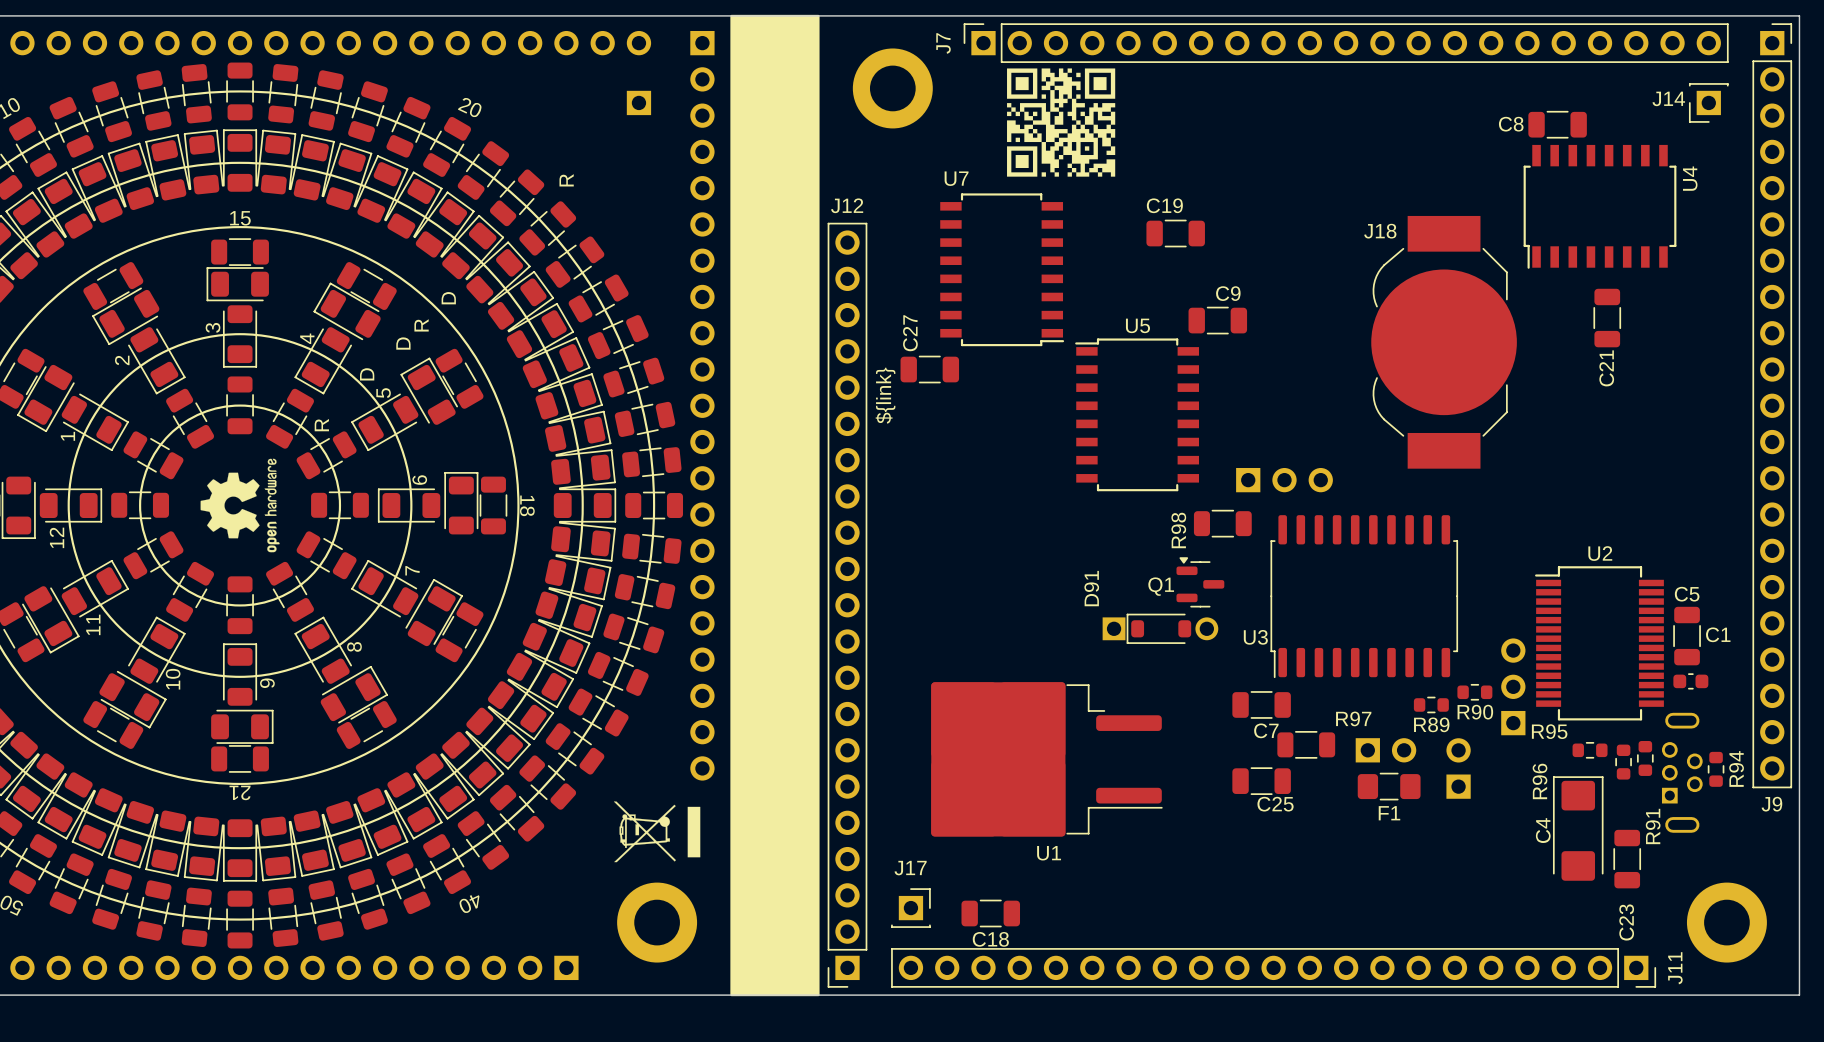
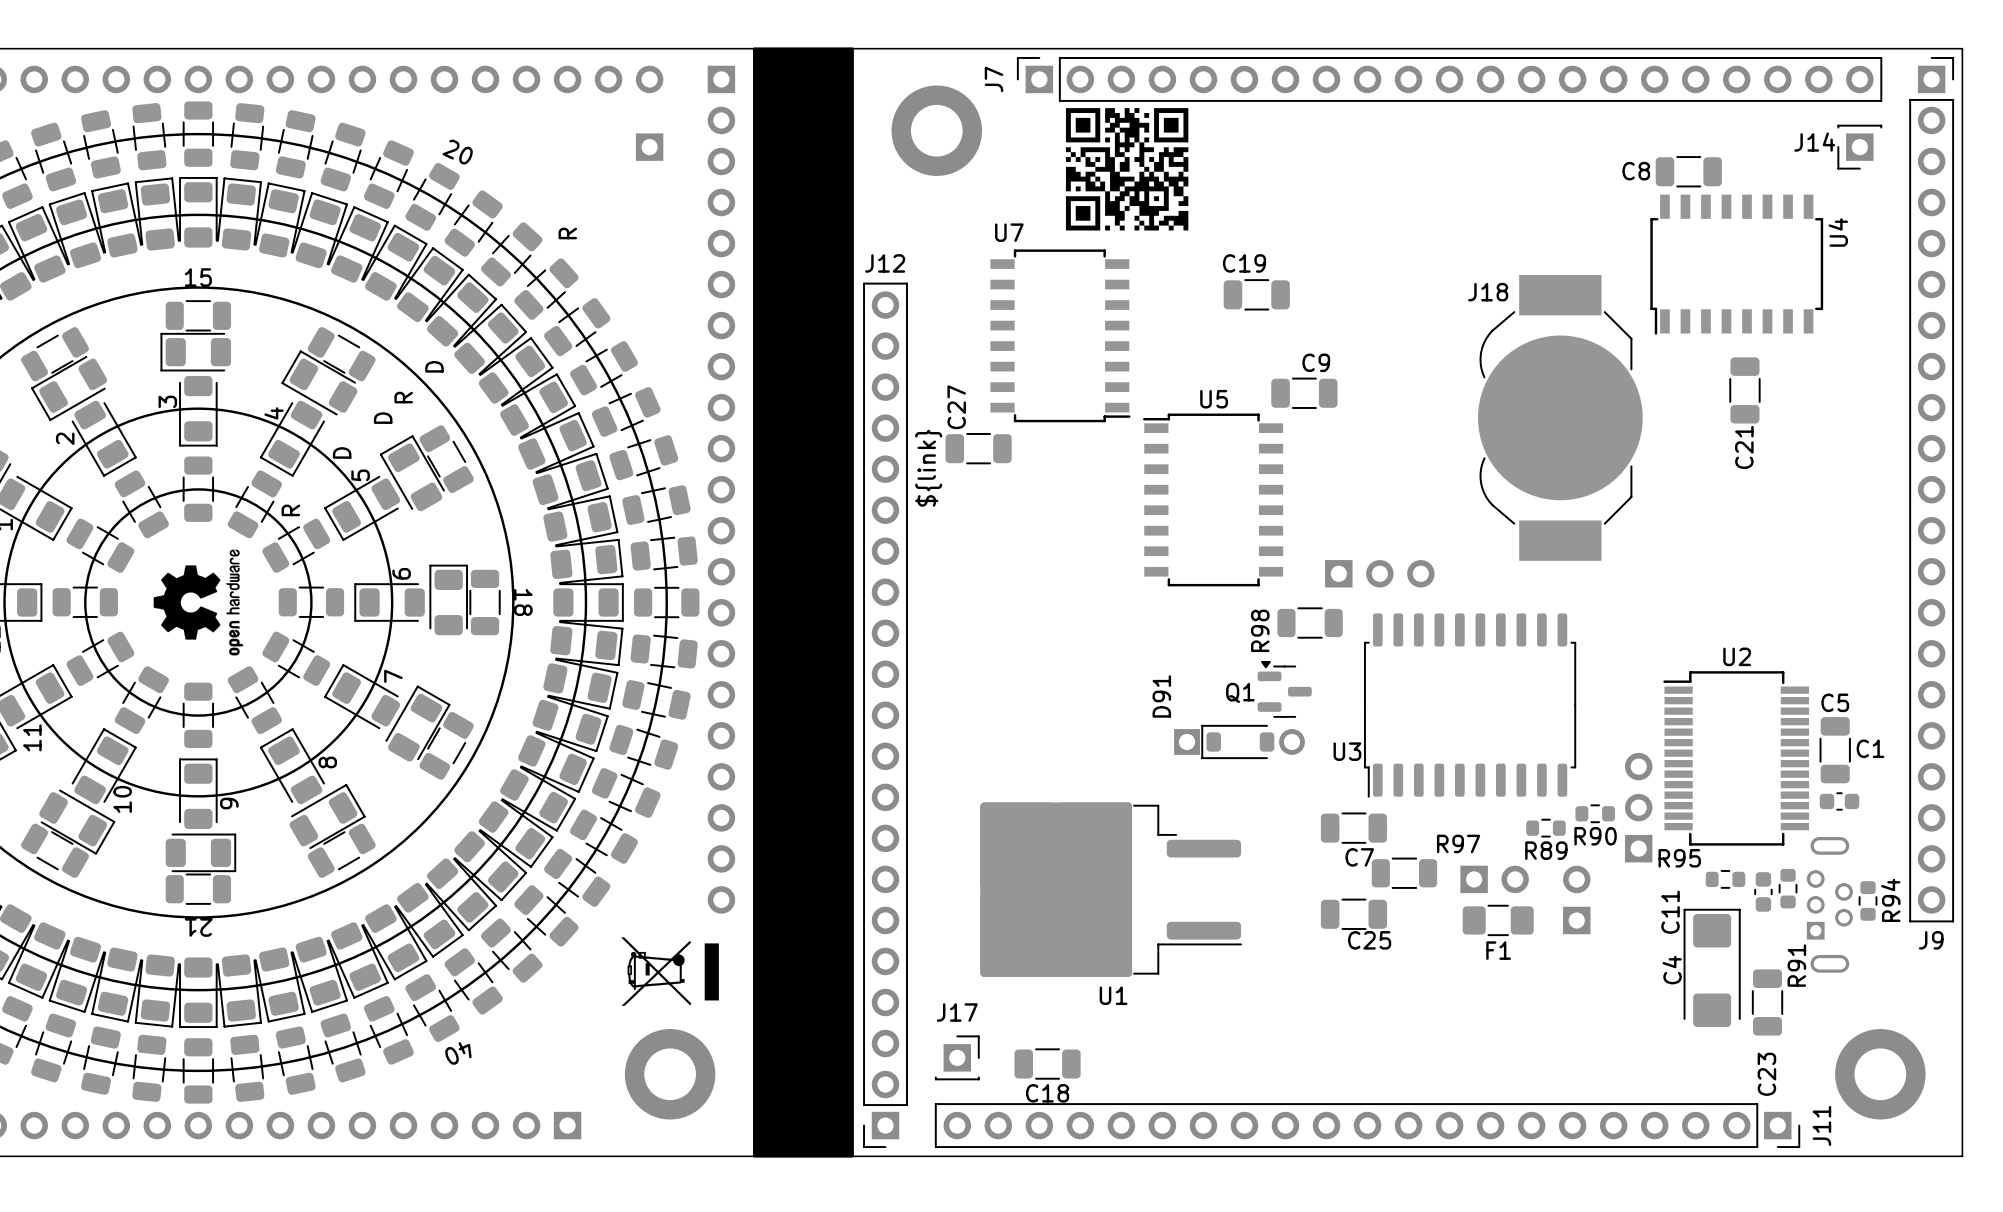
C11: none -> (1763, 891)
R96: (1623, 762) -> none

